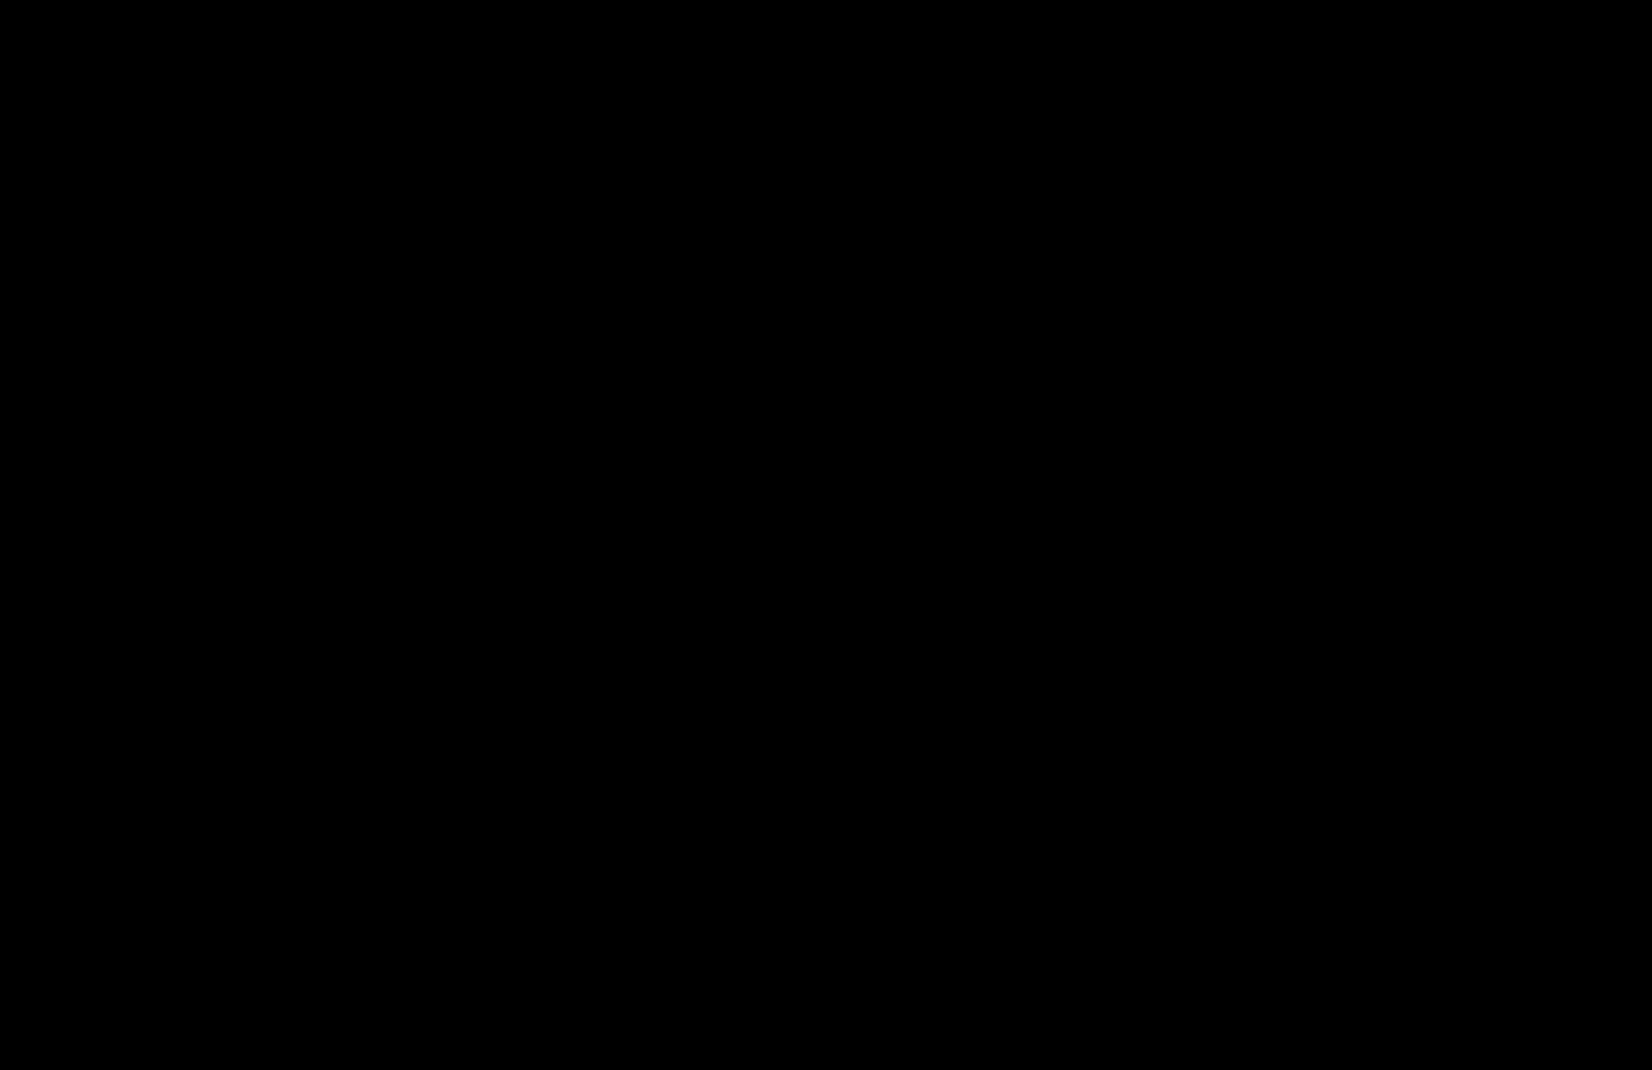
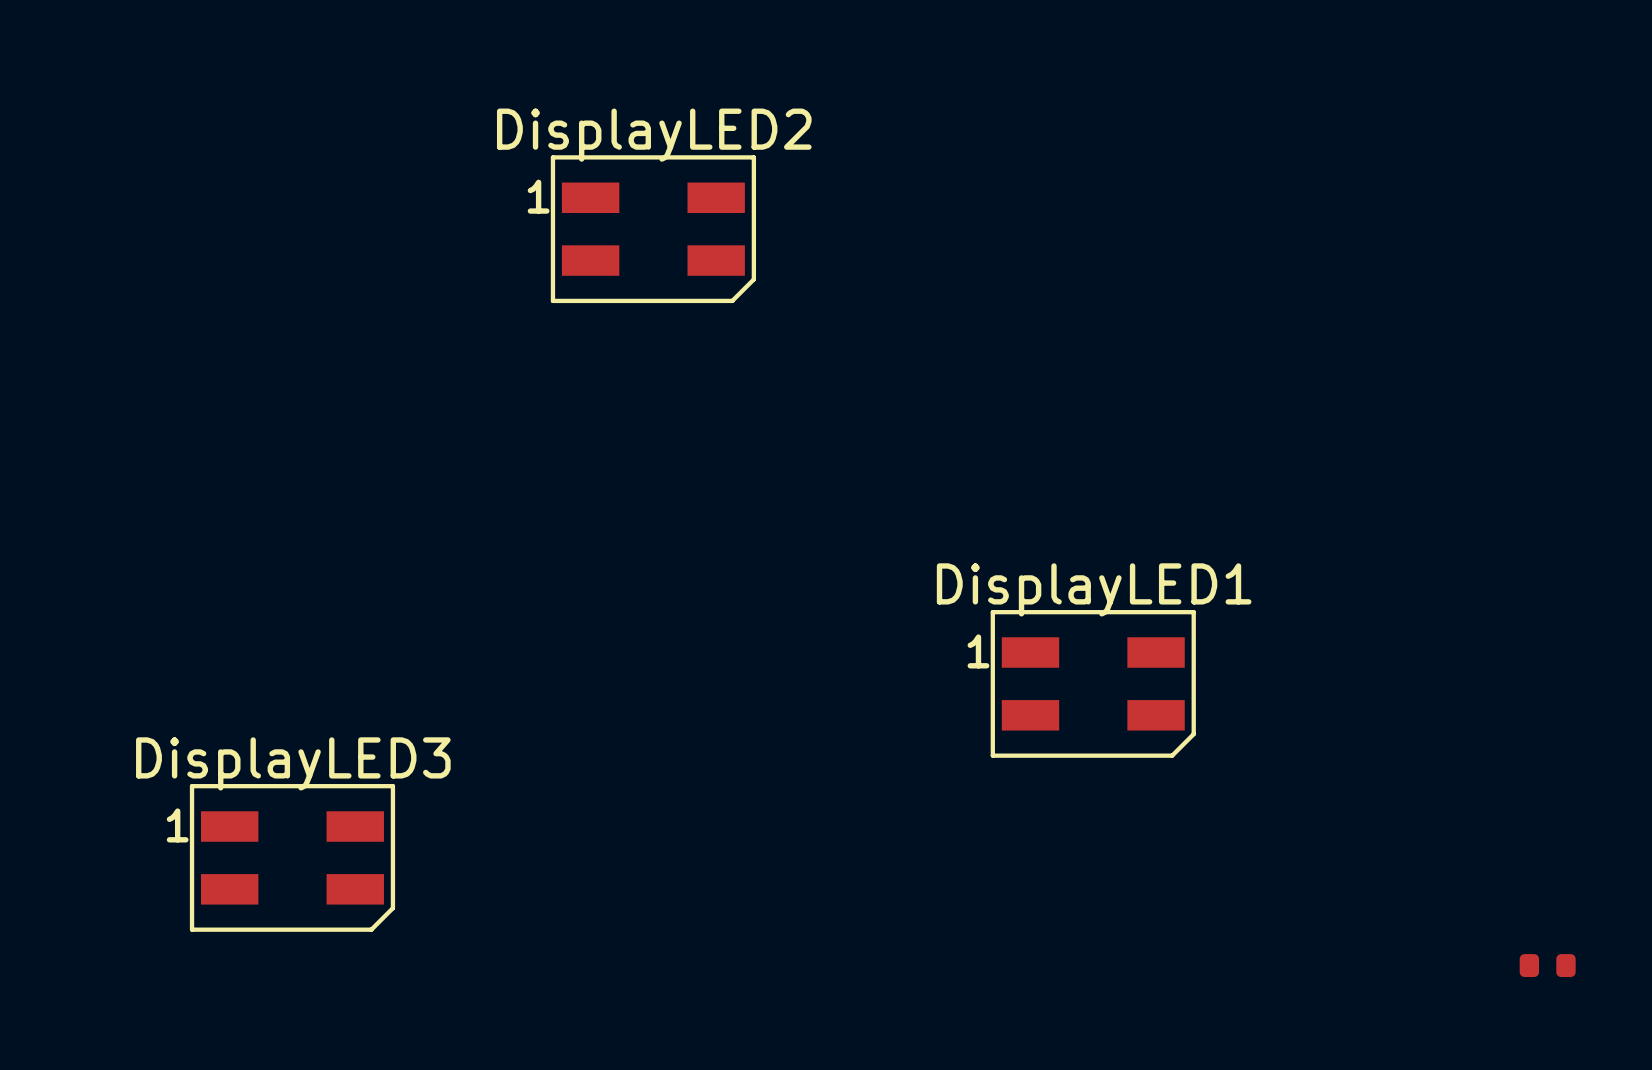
DisplayLED2: none -> (653, 229)
DisplayLED1: none -> (1093, 683)
DisplayLED3: none -> (292, 857)
part: none -> (1547, 965)

